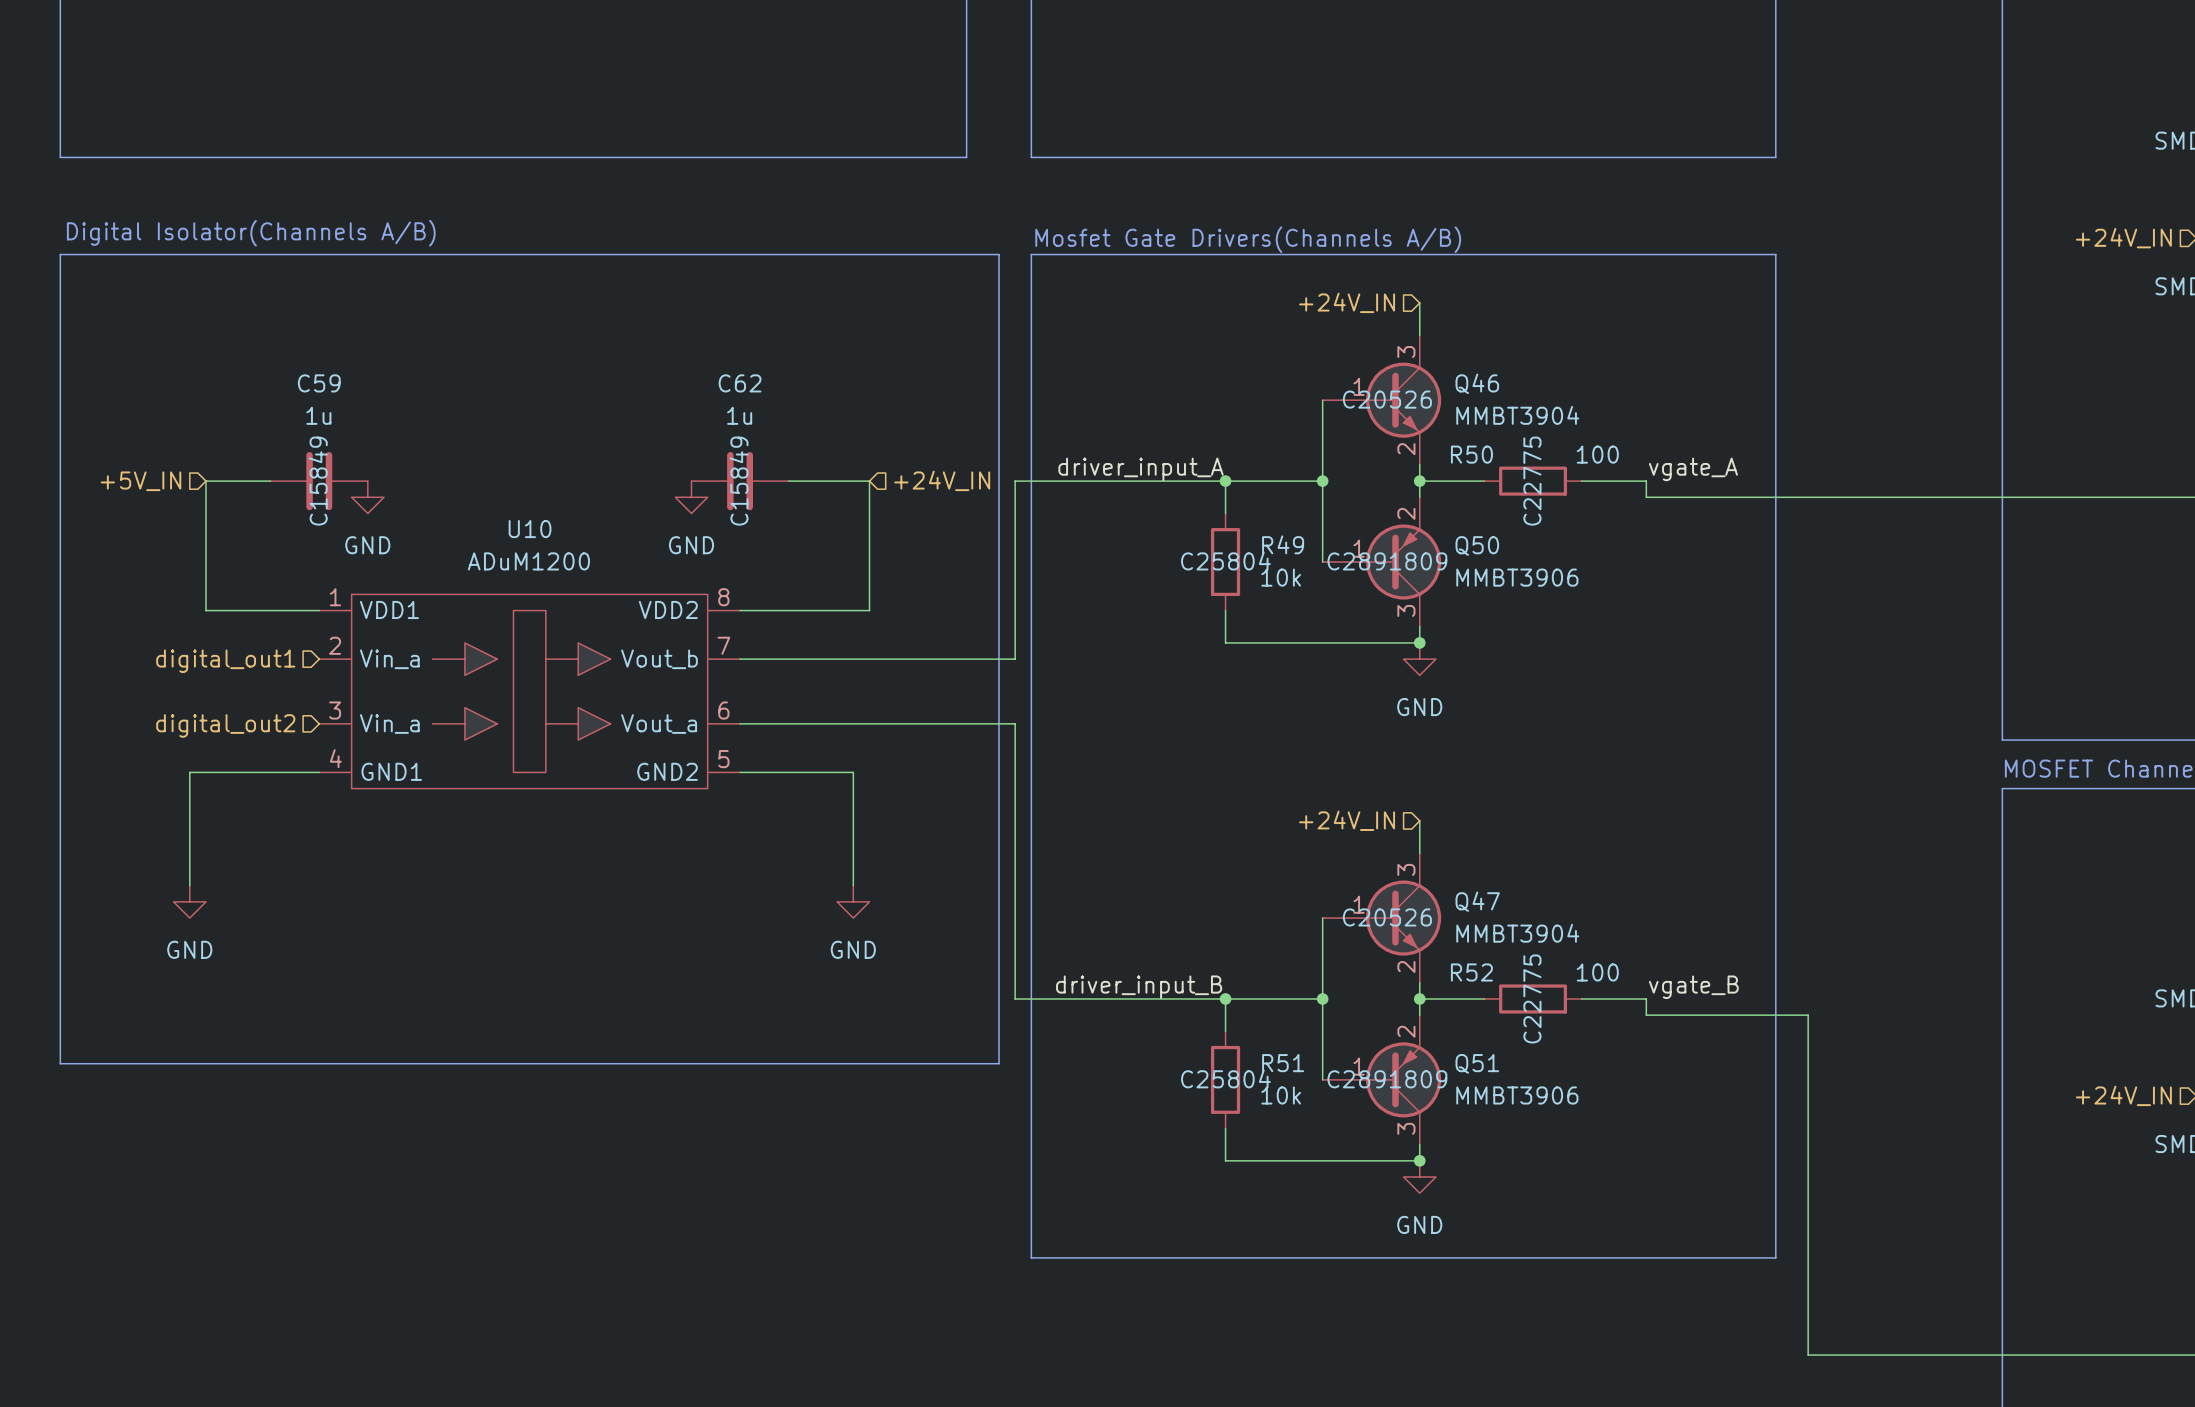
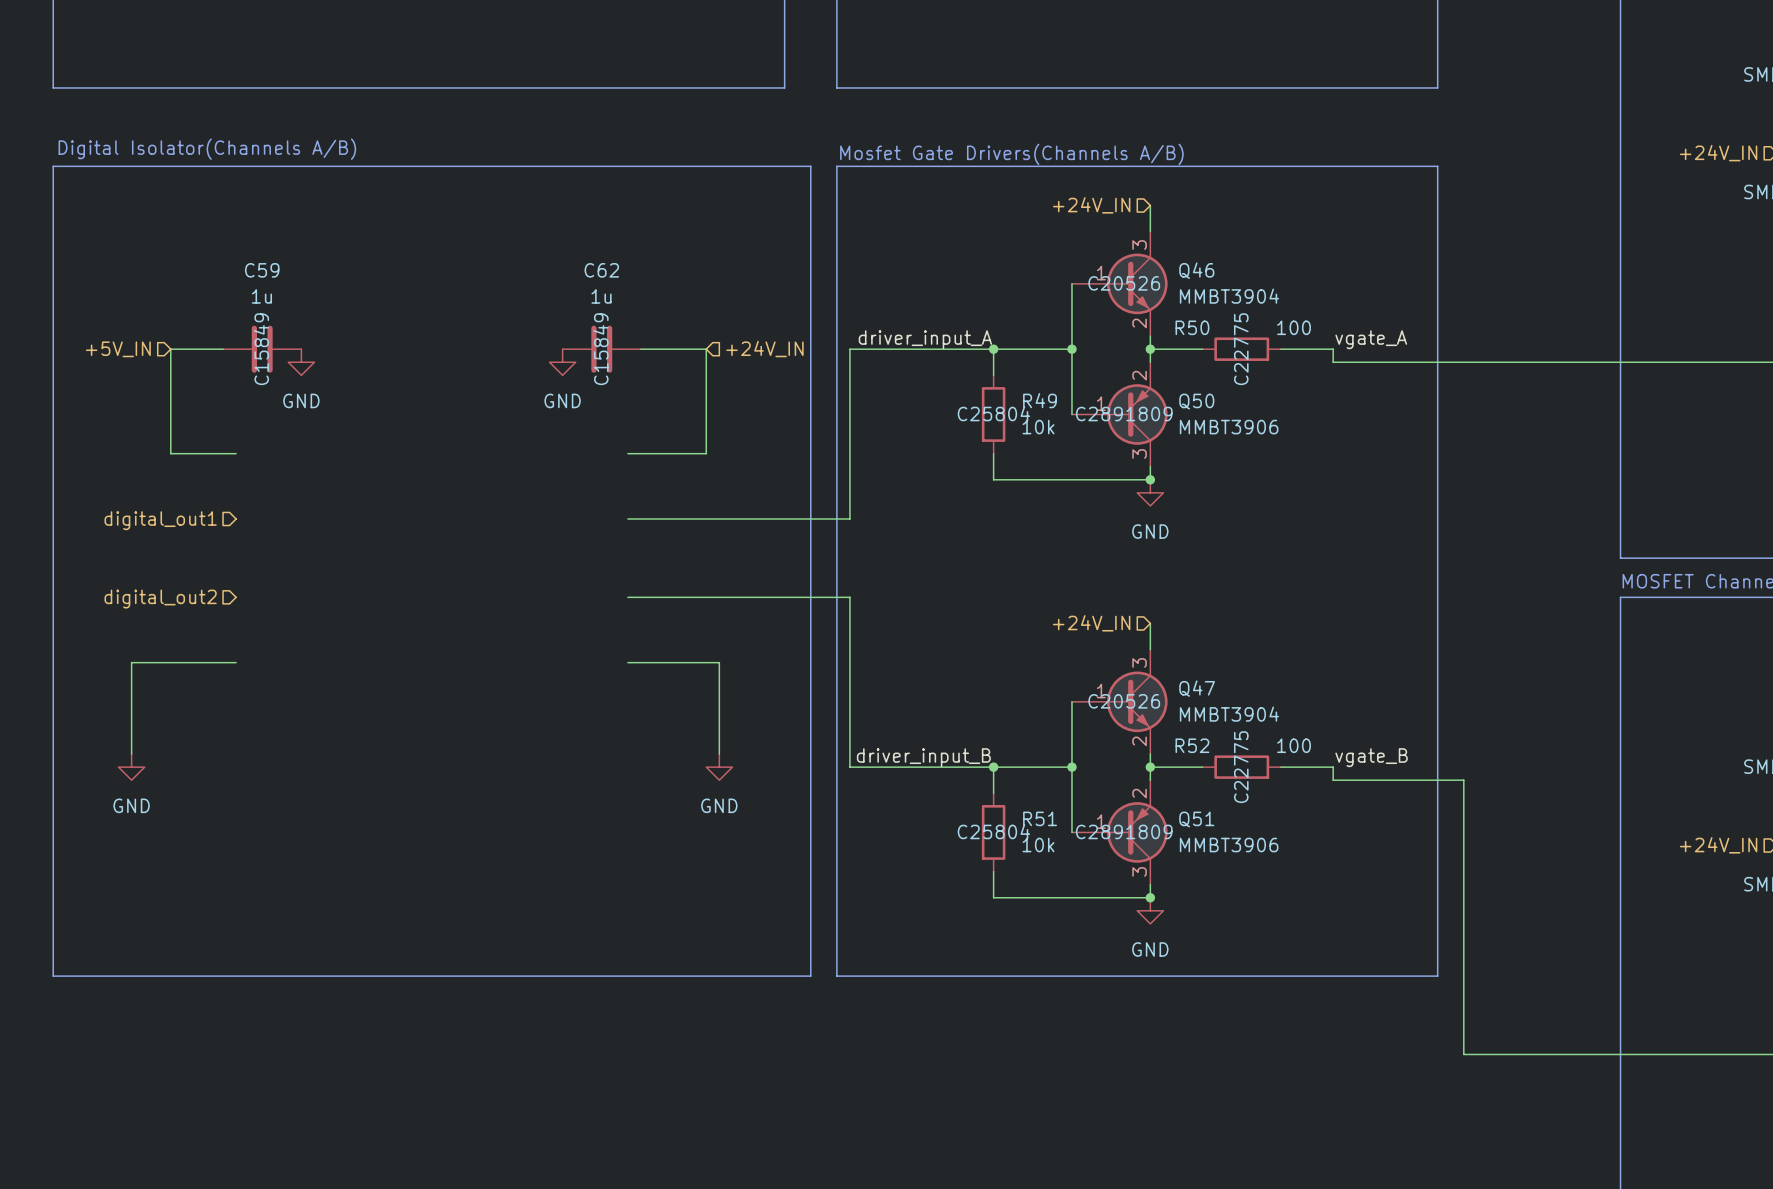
wire: (1047, 481) (1015, 481) (1015, 659) (740, 659) -> (849, 349) (849, 518) (627, 518)
wire: (286, 610) (319, 610) -> none
wire: (740, 610) (772, 610) -> none
hierarchical label position: digital_out1 (225, 661) -> digital_out1 (160, 520)
U10: ADuM1200 (529, 691) -> none
wire: (740, 723) (1015, 723) (1015, 998) (1047, 998) -> (627, 597) (849, 597) (849, 767)
hierarchical label position: digital_out2 (225, 725) -> digital_out2 (160, 599)
wire: (319, 772) (189, 772) (189, 885) -> (236, 662) (131, 662) (131, 754)
wire: (740, 772) (853, 772) (853, 885) -> (627, 662) (719, 662) (719, 754)
power symbol position: GND (189, 901) -> GND (131, 767)
power symbol position: GND (853, 901) -> GND (719, 767)
line: (60, 1063) (998, 1063) -> (53, 819) (53, 976) (810, 976) (810, 819)

